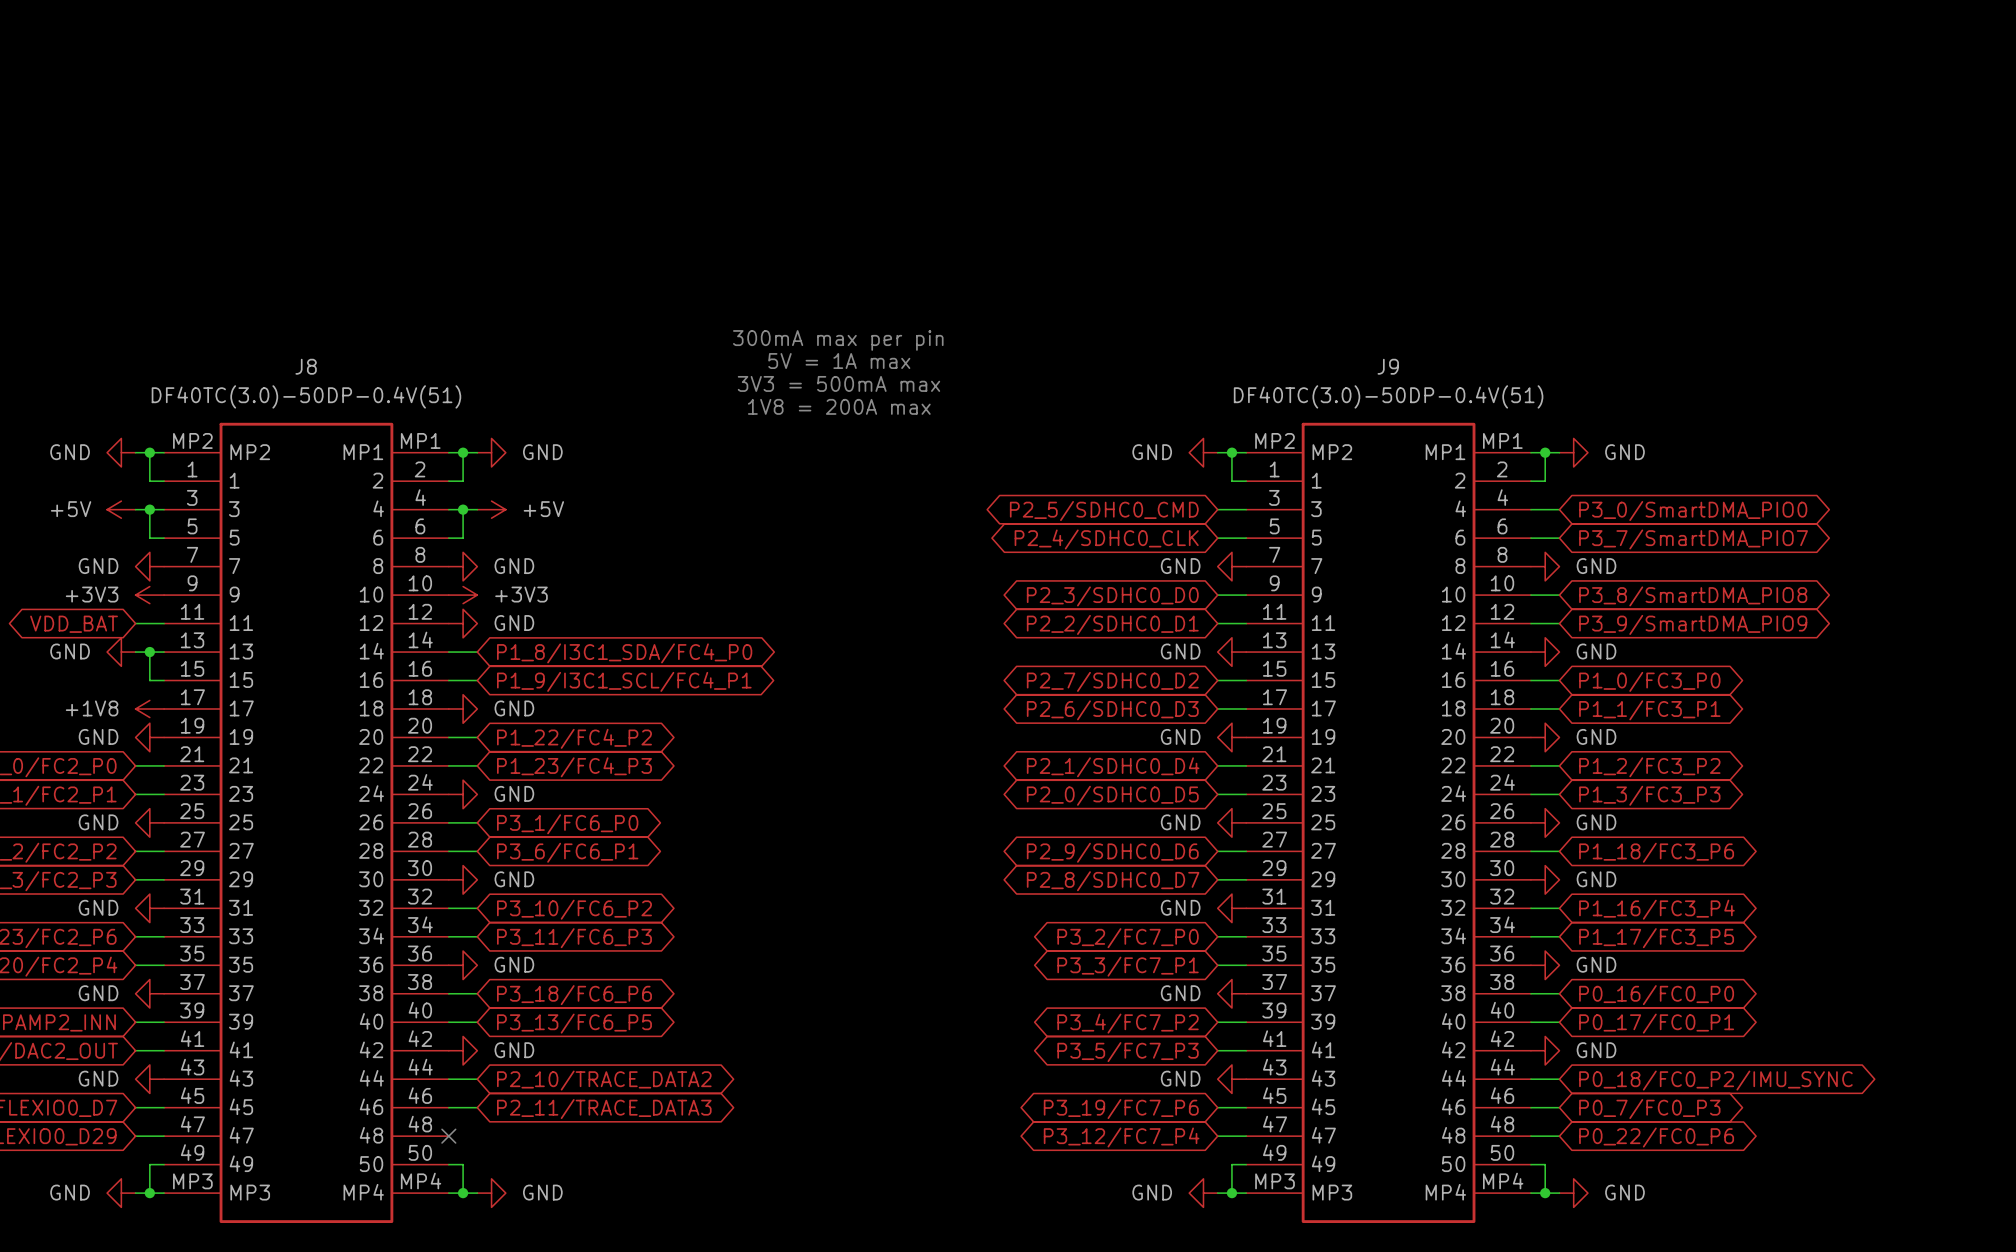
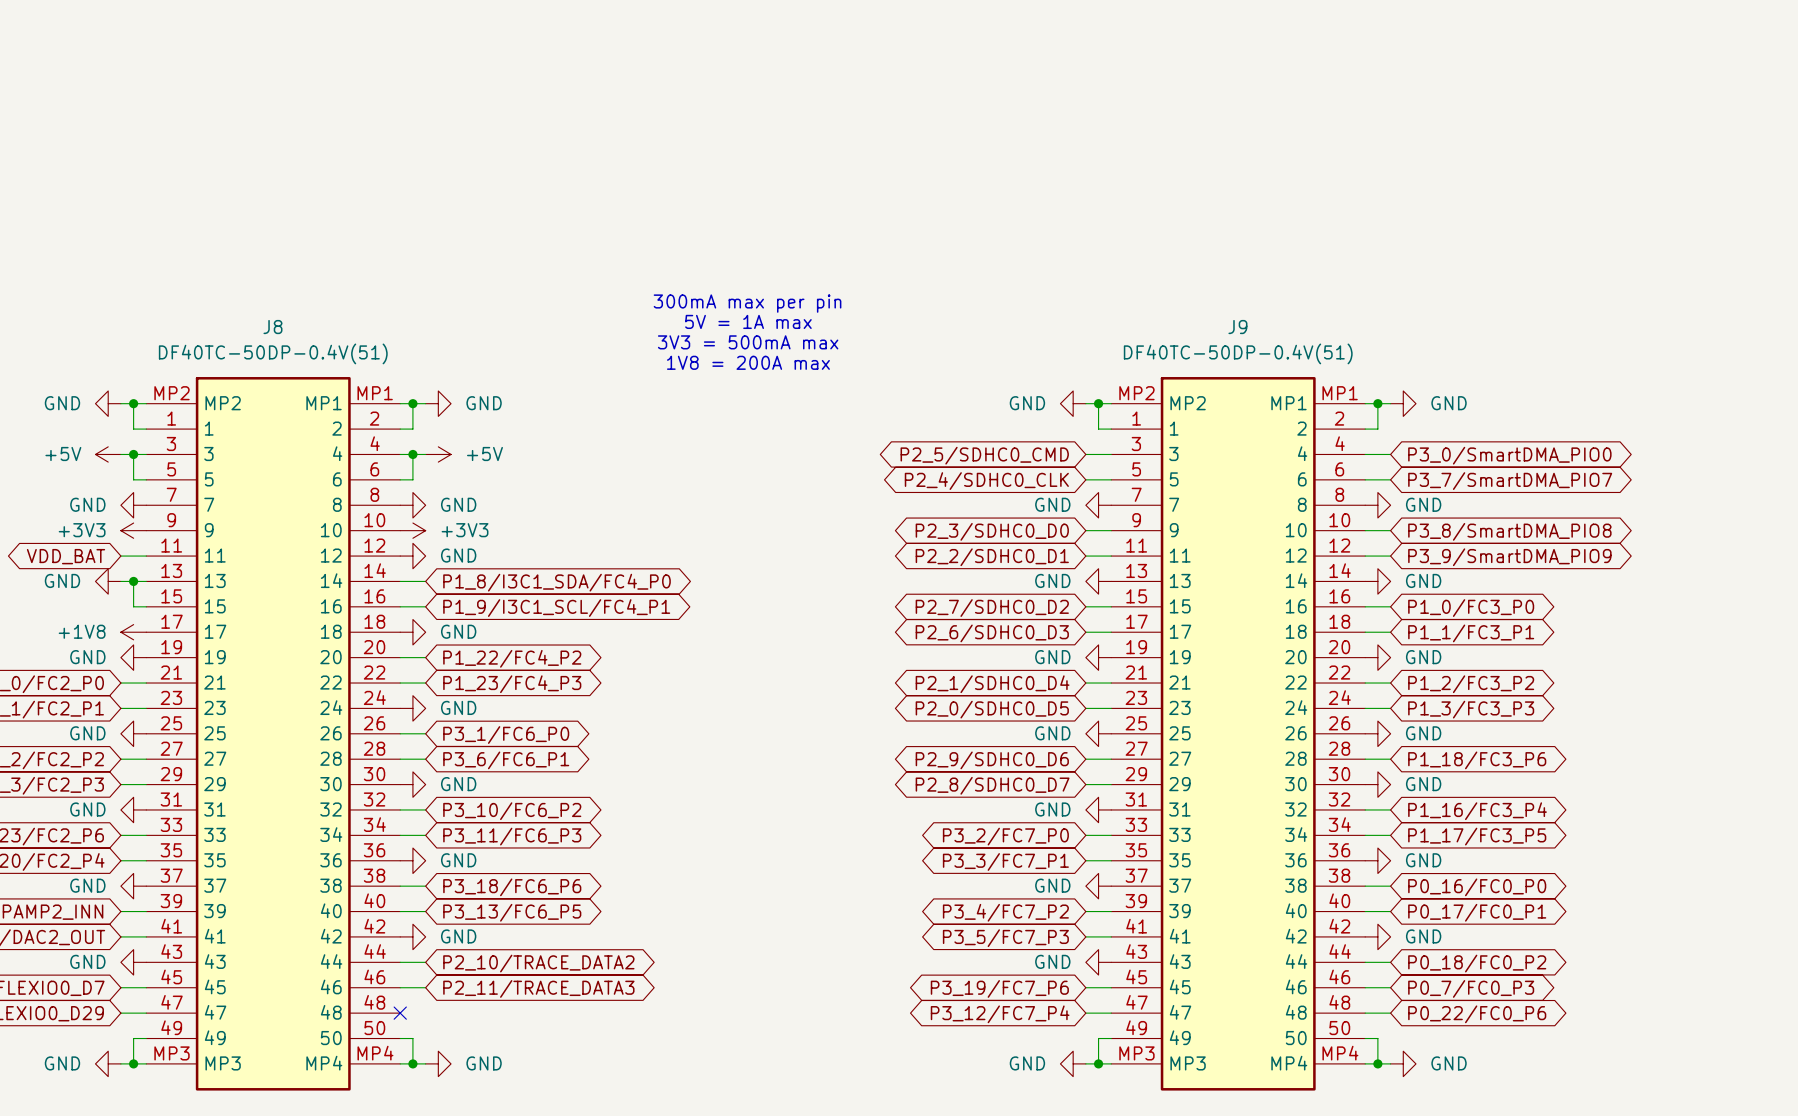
J8 value: DF40TC(3.0)-50DP-0.4V(51) (306, 396) -> DF40TC-50DP-0.4V(51) (273, 353)
J9 value: DF40TC(3.0)-50DP-0.4V(51) (1388, 396) -> DF40TC-50DP-0.4V(51) (1238, 353)
global label: P0_18/FC0_P2/IMU_SYNC (1715, 1080) -> P0_18/FC0_P2 (1477, 963)

